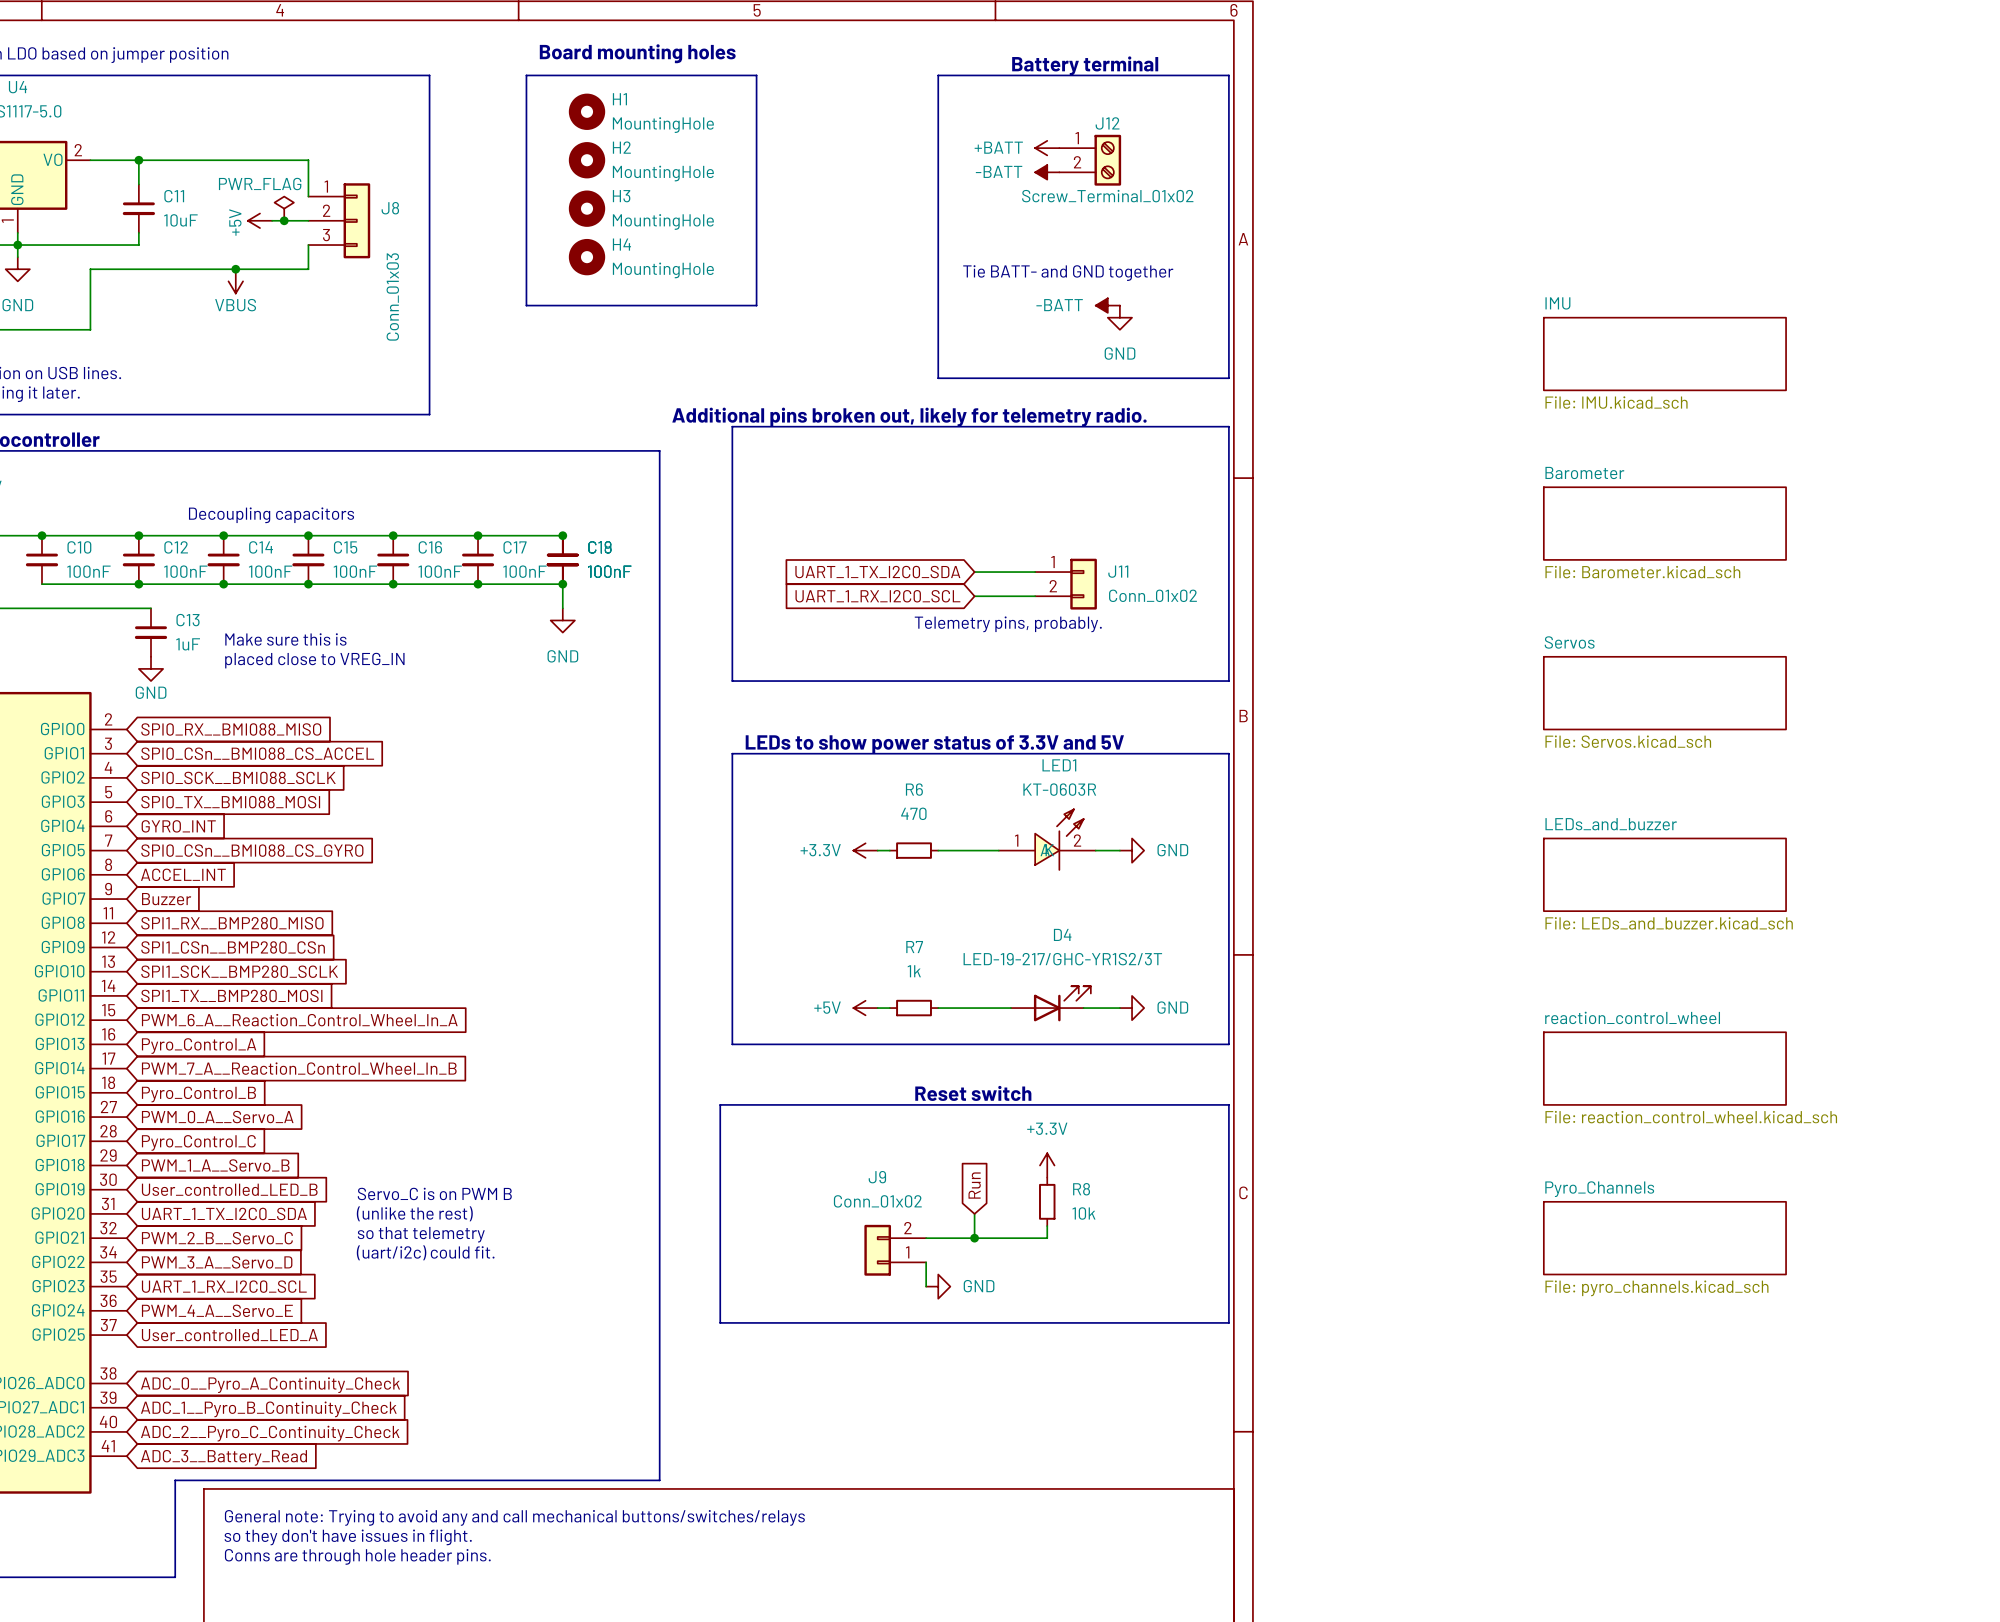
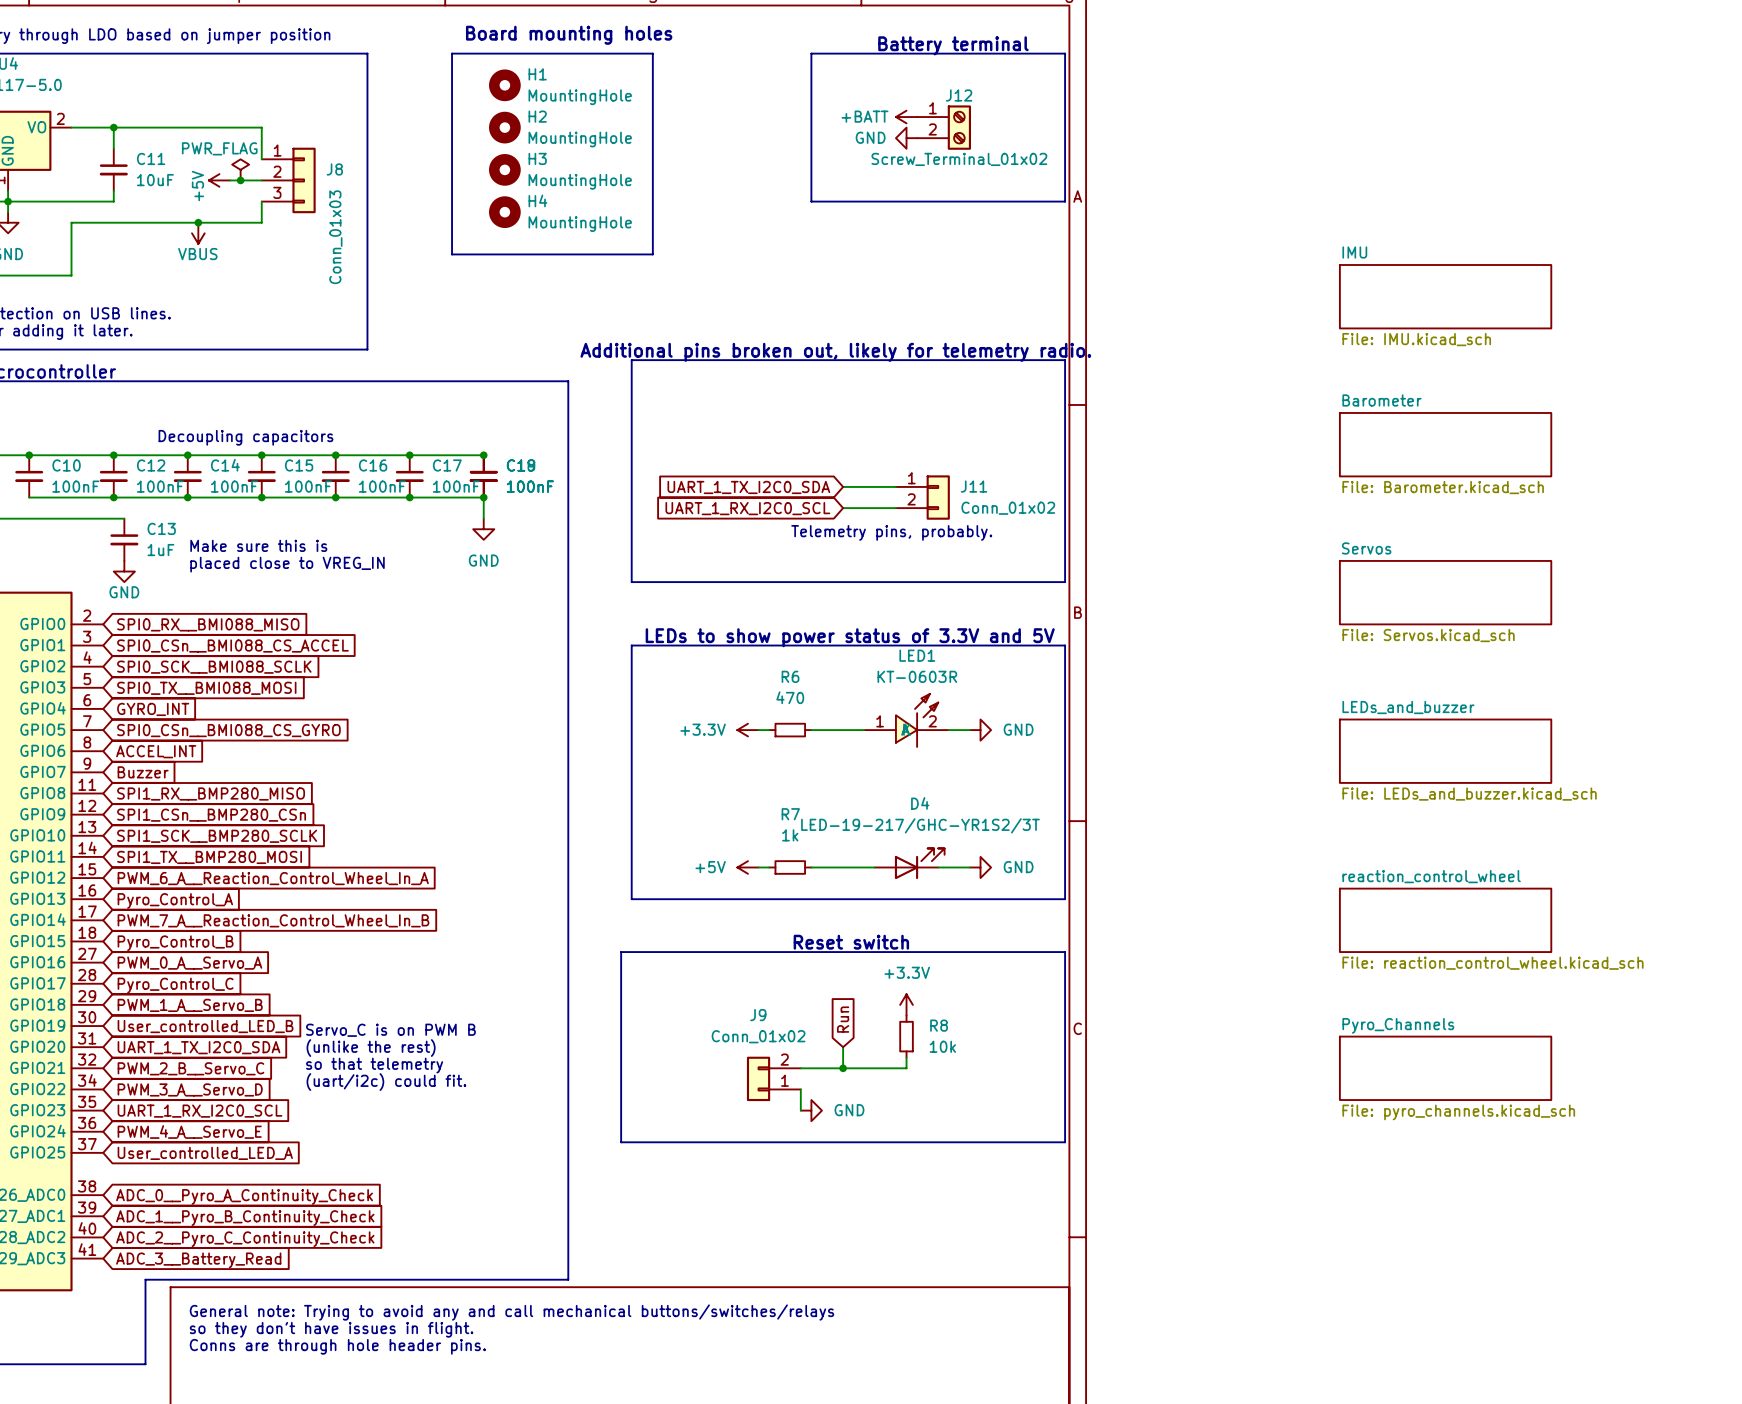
power symbol: -BATT (1047, 172) -> GND (906, 138)
line: (938, 245) (938, 378) (1228, 378) (1228, 245) -> (811, 201) (1065, 201)
text: Tie BATT- and GND together (1068, 273) -> none
power symbol: -BATT (1107, 305) -> none
power symbol: GND (1119, 317) -> none

